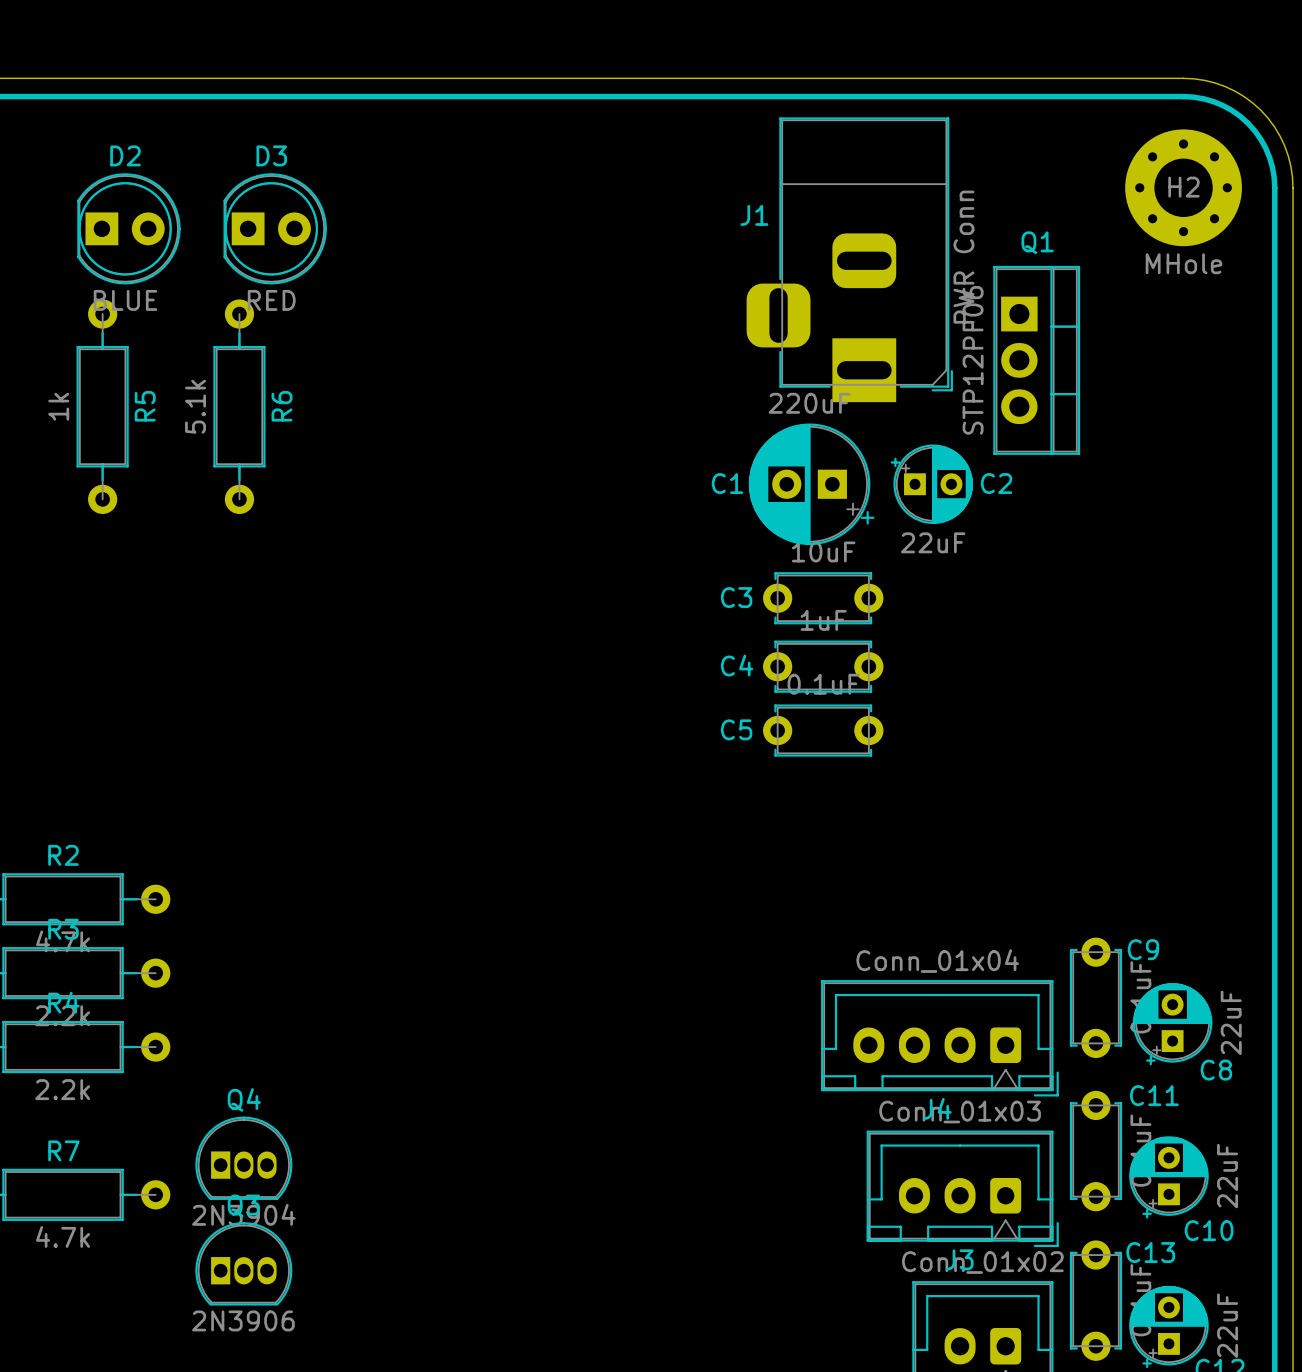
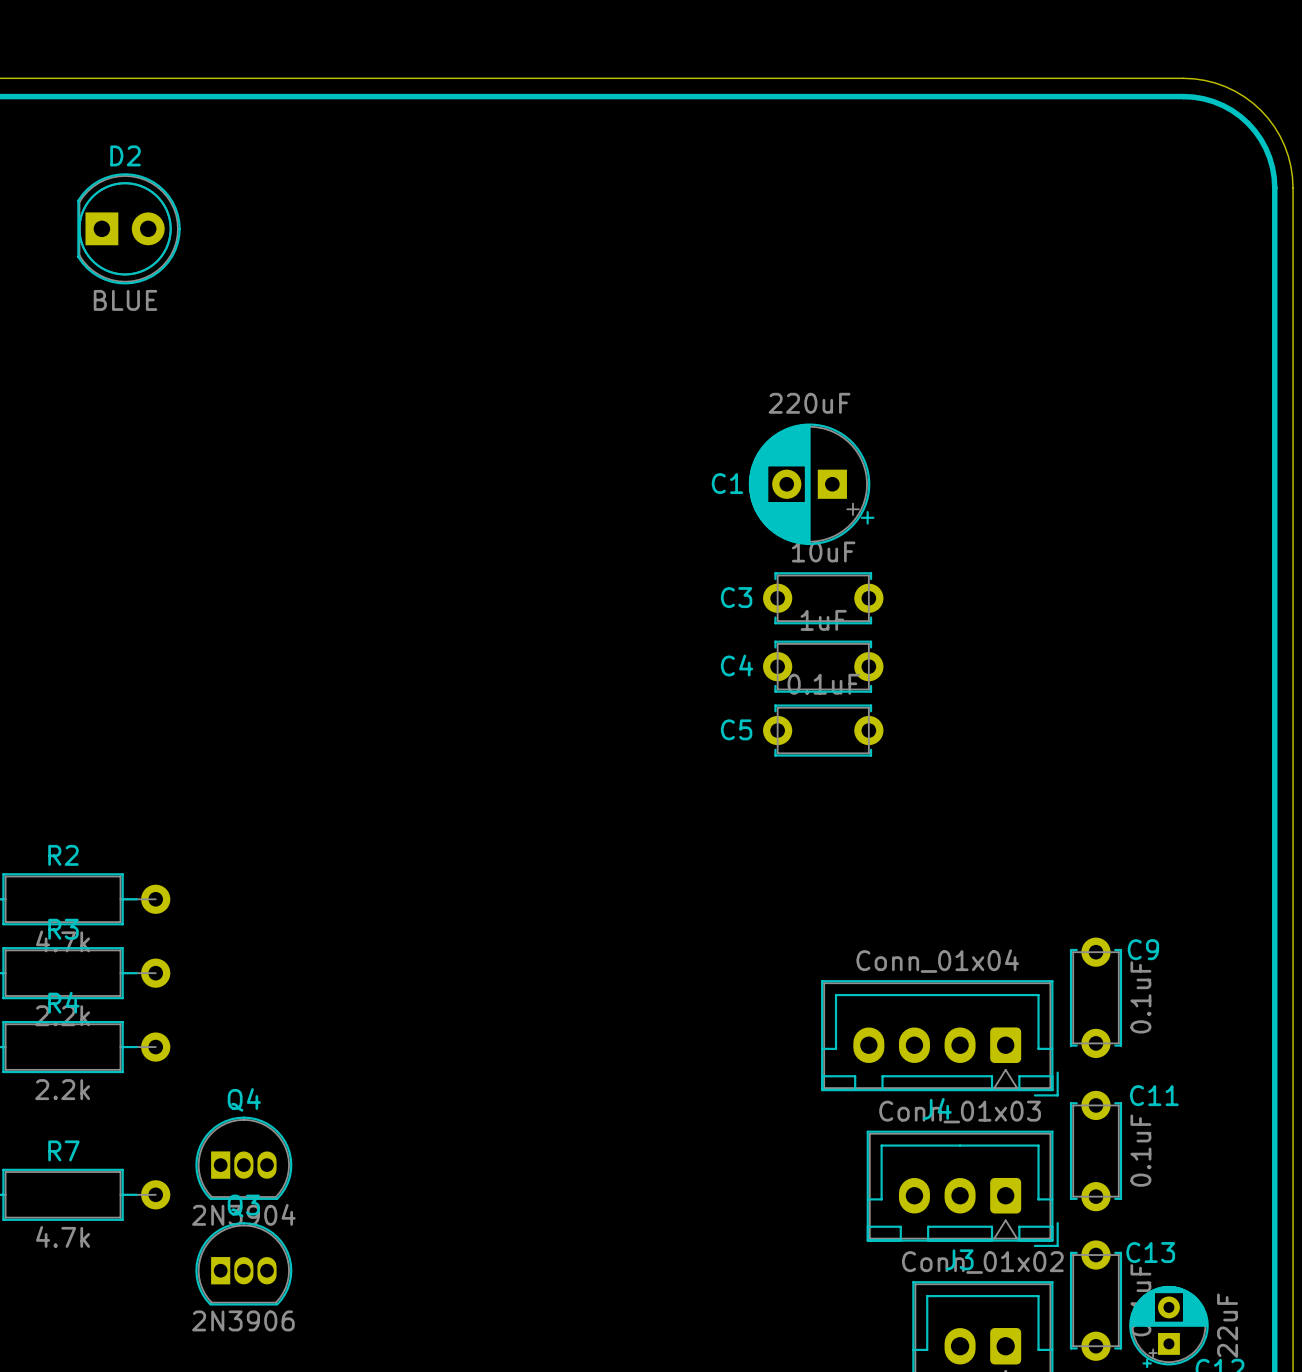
H2: MHole (1183, 187) -> none
D3: RED (275, 228) -> none
J1: PWR Conn (849, 259) -> none
Q1: STP12PF06 (1036, 360) -> none
R5: 1k (102, 406) -> none
R6: 5.1k (239, 406) -> none
C2: 22uF (931, 484) -> none
C8: 22uF (1172, 1024) -> none
C10: 22uF (1168, 1177) -> none

